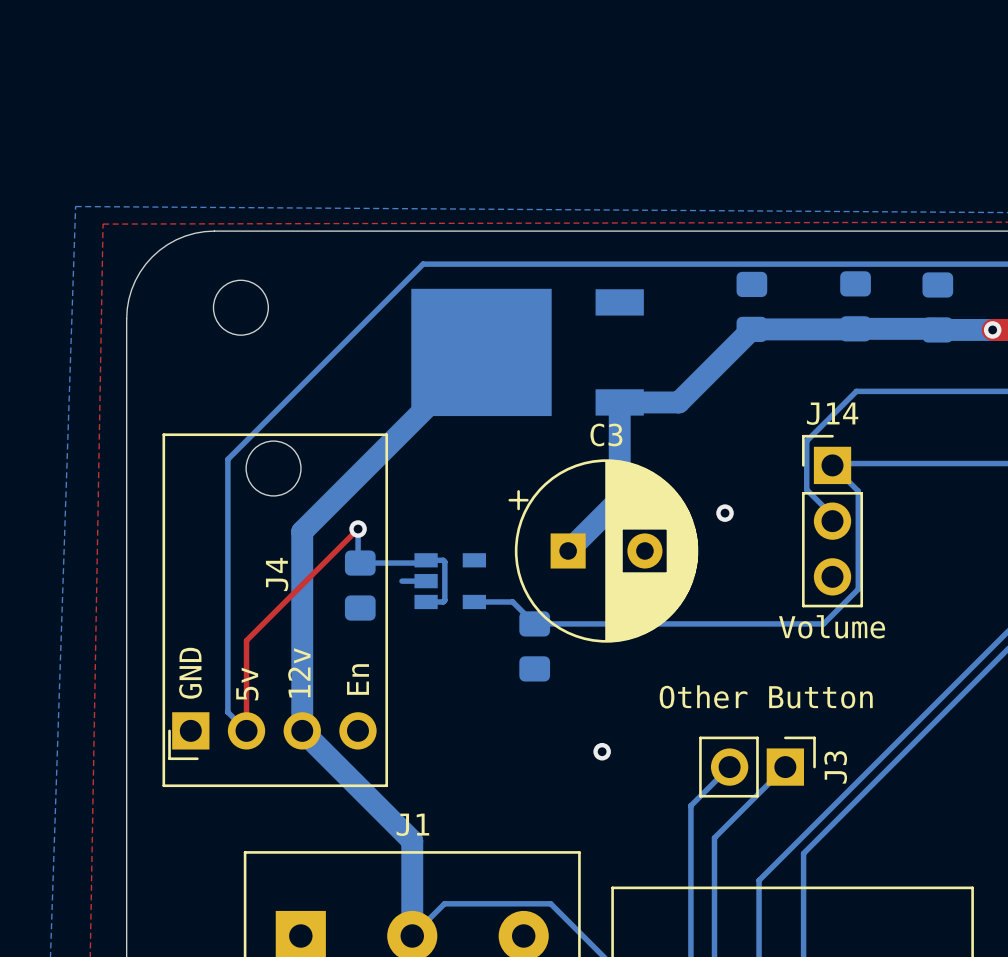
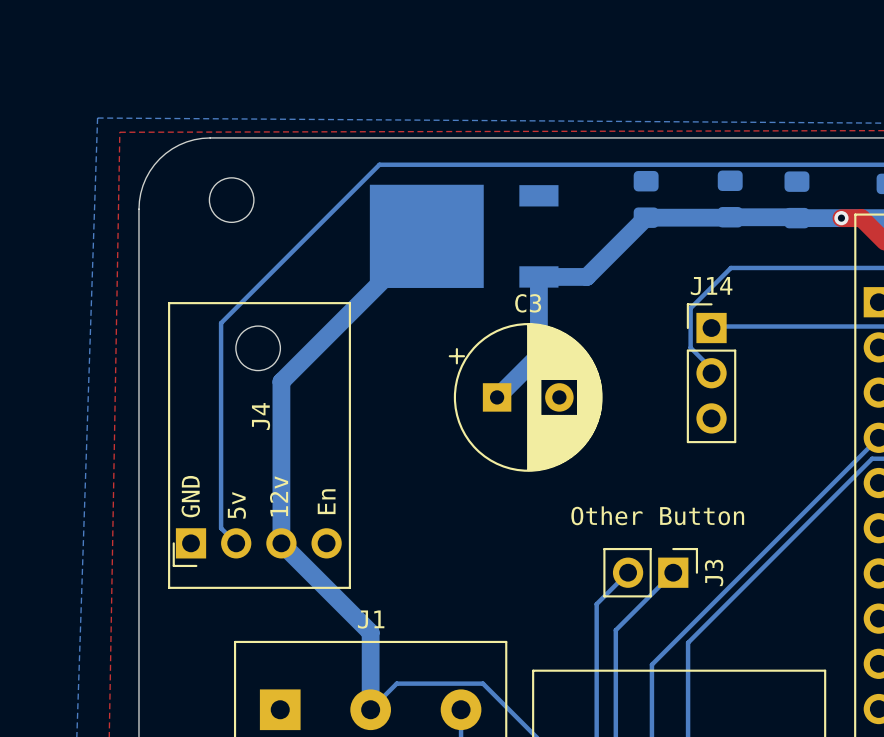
J4 footprint: [162, 433, 389, 788] -> [168, 302, 351, 589]
bottom track: (832, 465) (858, 491) (858, 589) (823, 623) (534, 623) (512, 601) (474, 601) -> none
via: (725, 513) -> none
bottom track: (358, 529) (358, 560) (360, 563) (423, 563) (426, 560) (444, 561) (444, 600) (426, 601) -> none
top track: (358, 529) (246, 640) (246, 730) -> none
via: (358, 529) -> none
bottom track: (401, 581) (426, 581) -> none
part: (450, 581) -> none
part: (360, 585) -> none
J14 value: Volume (832, 626) -> none
part: (534, 646) -> none
via: (602, 751) -> none

